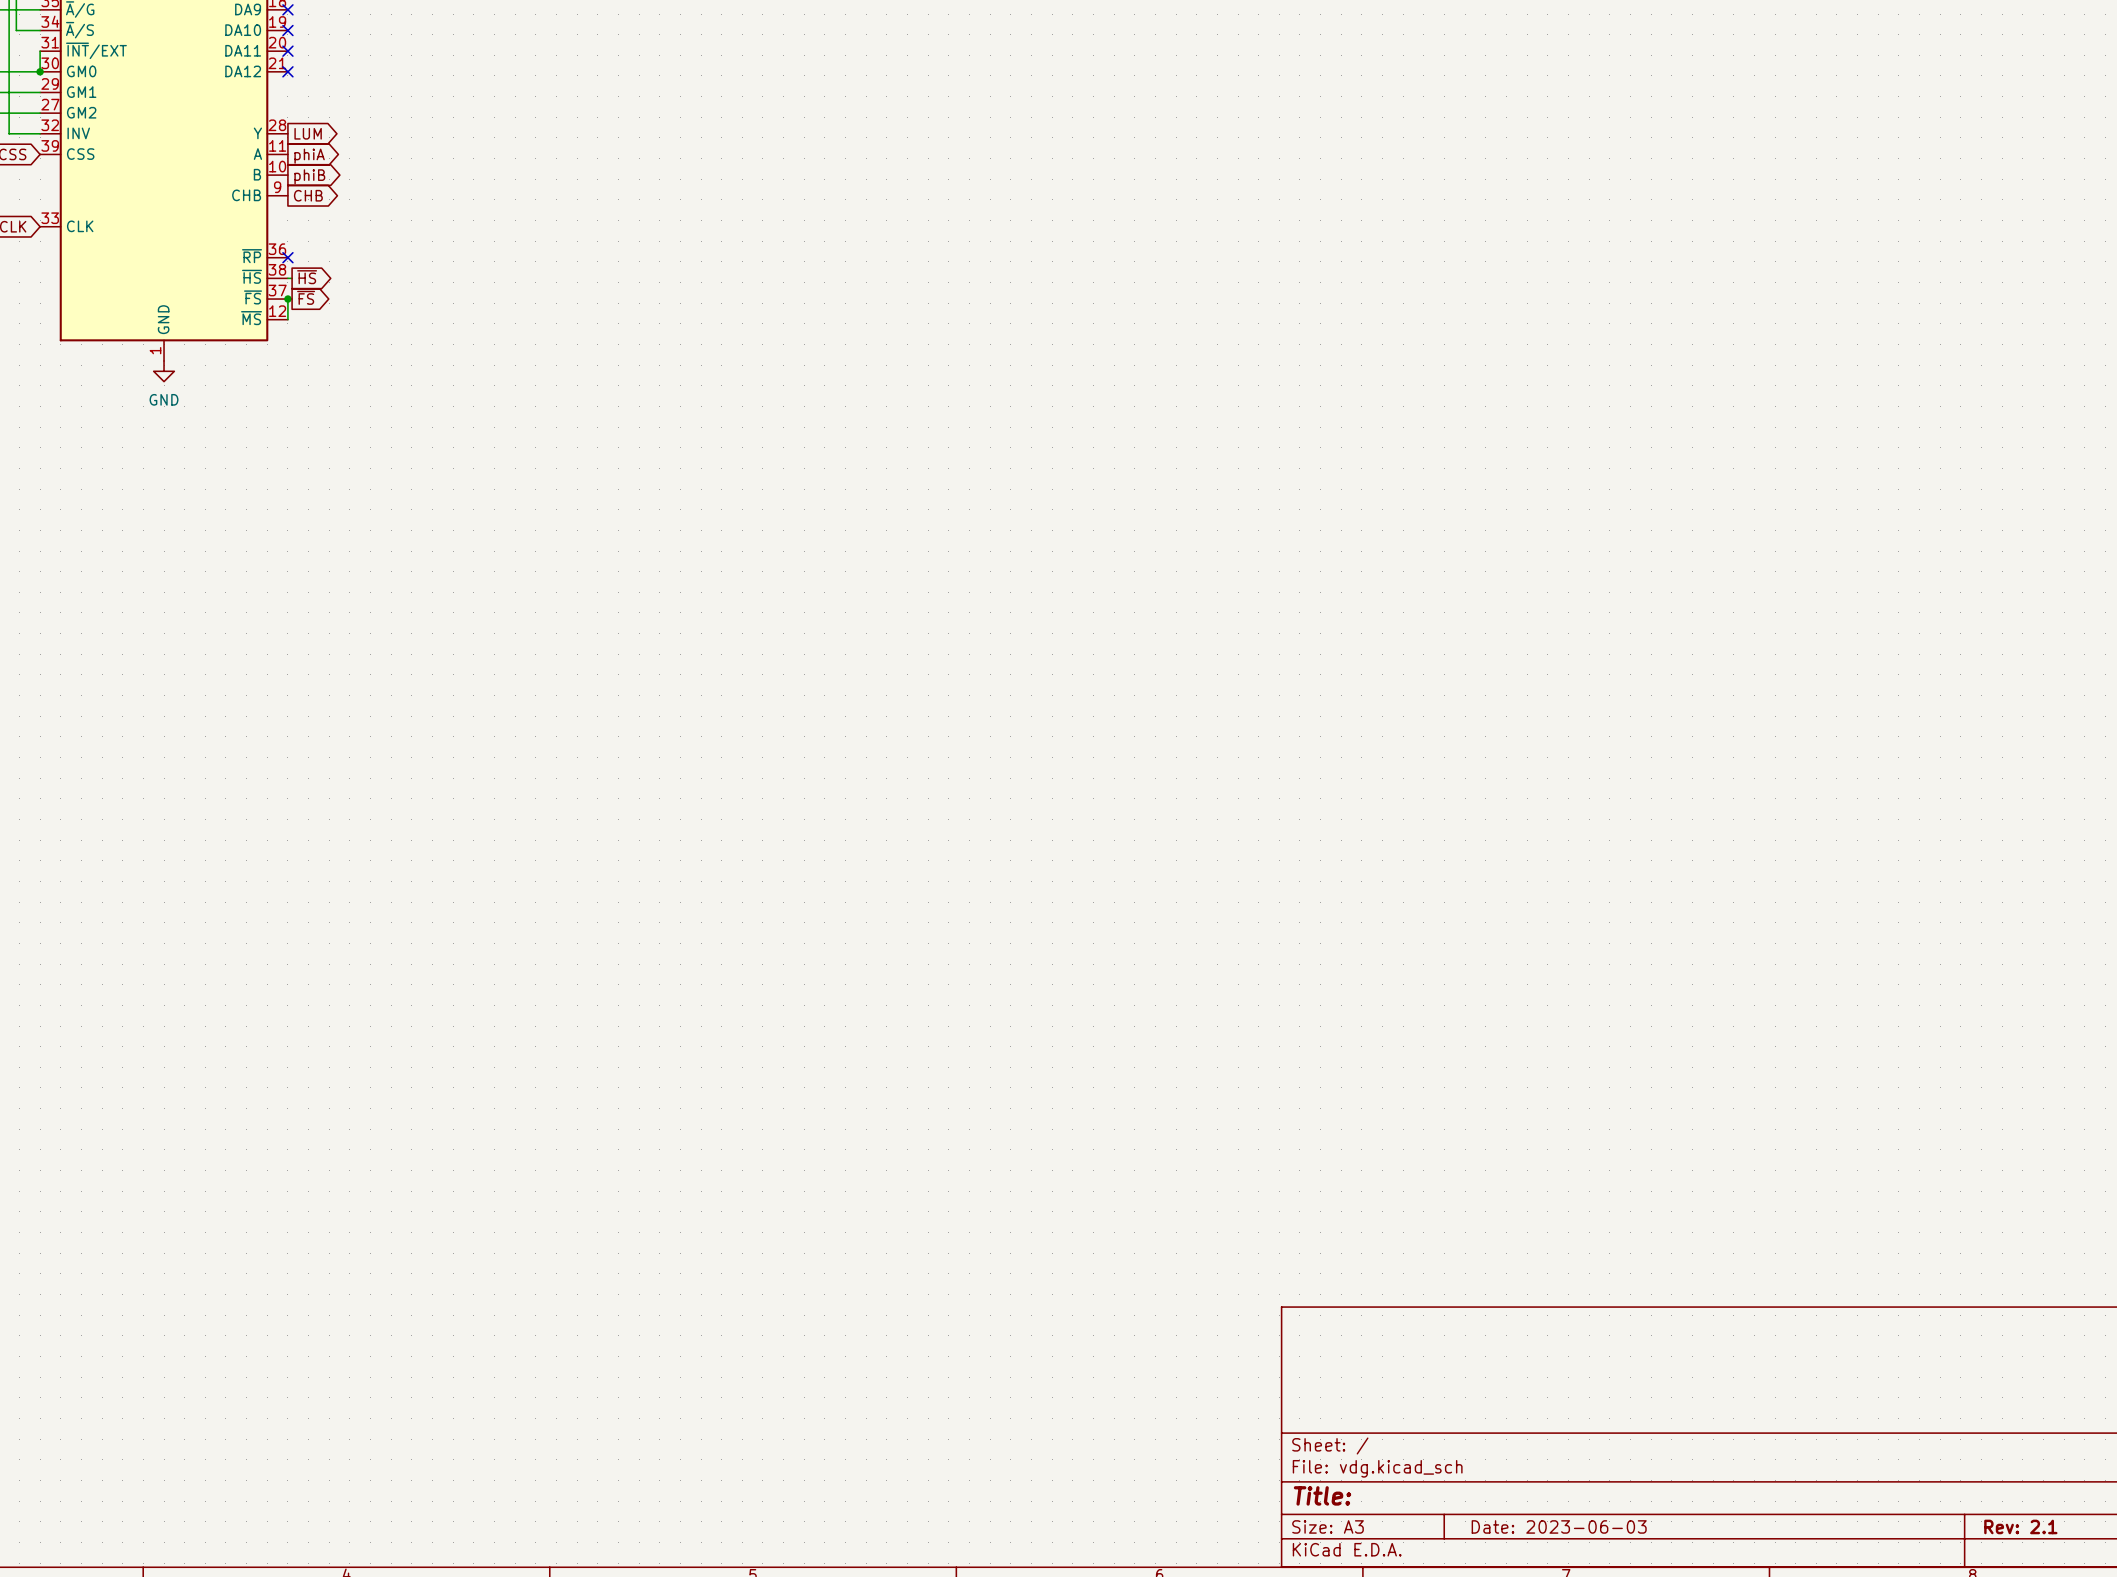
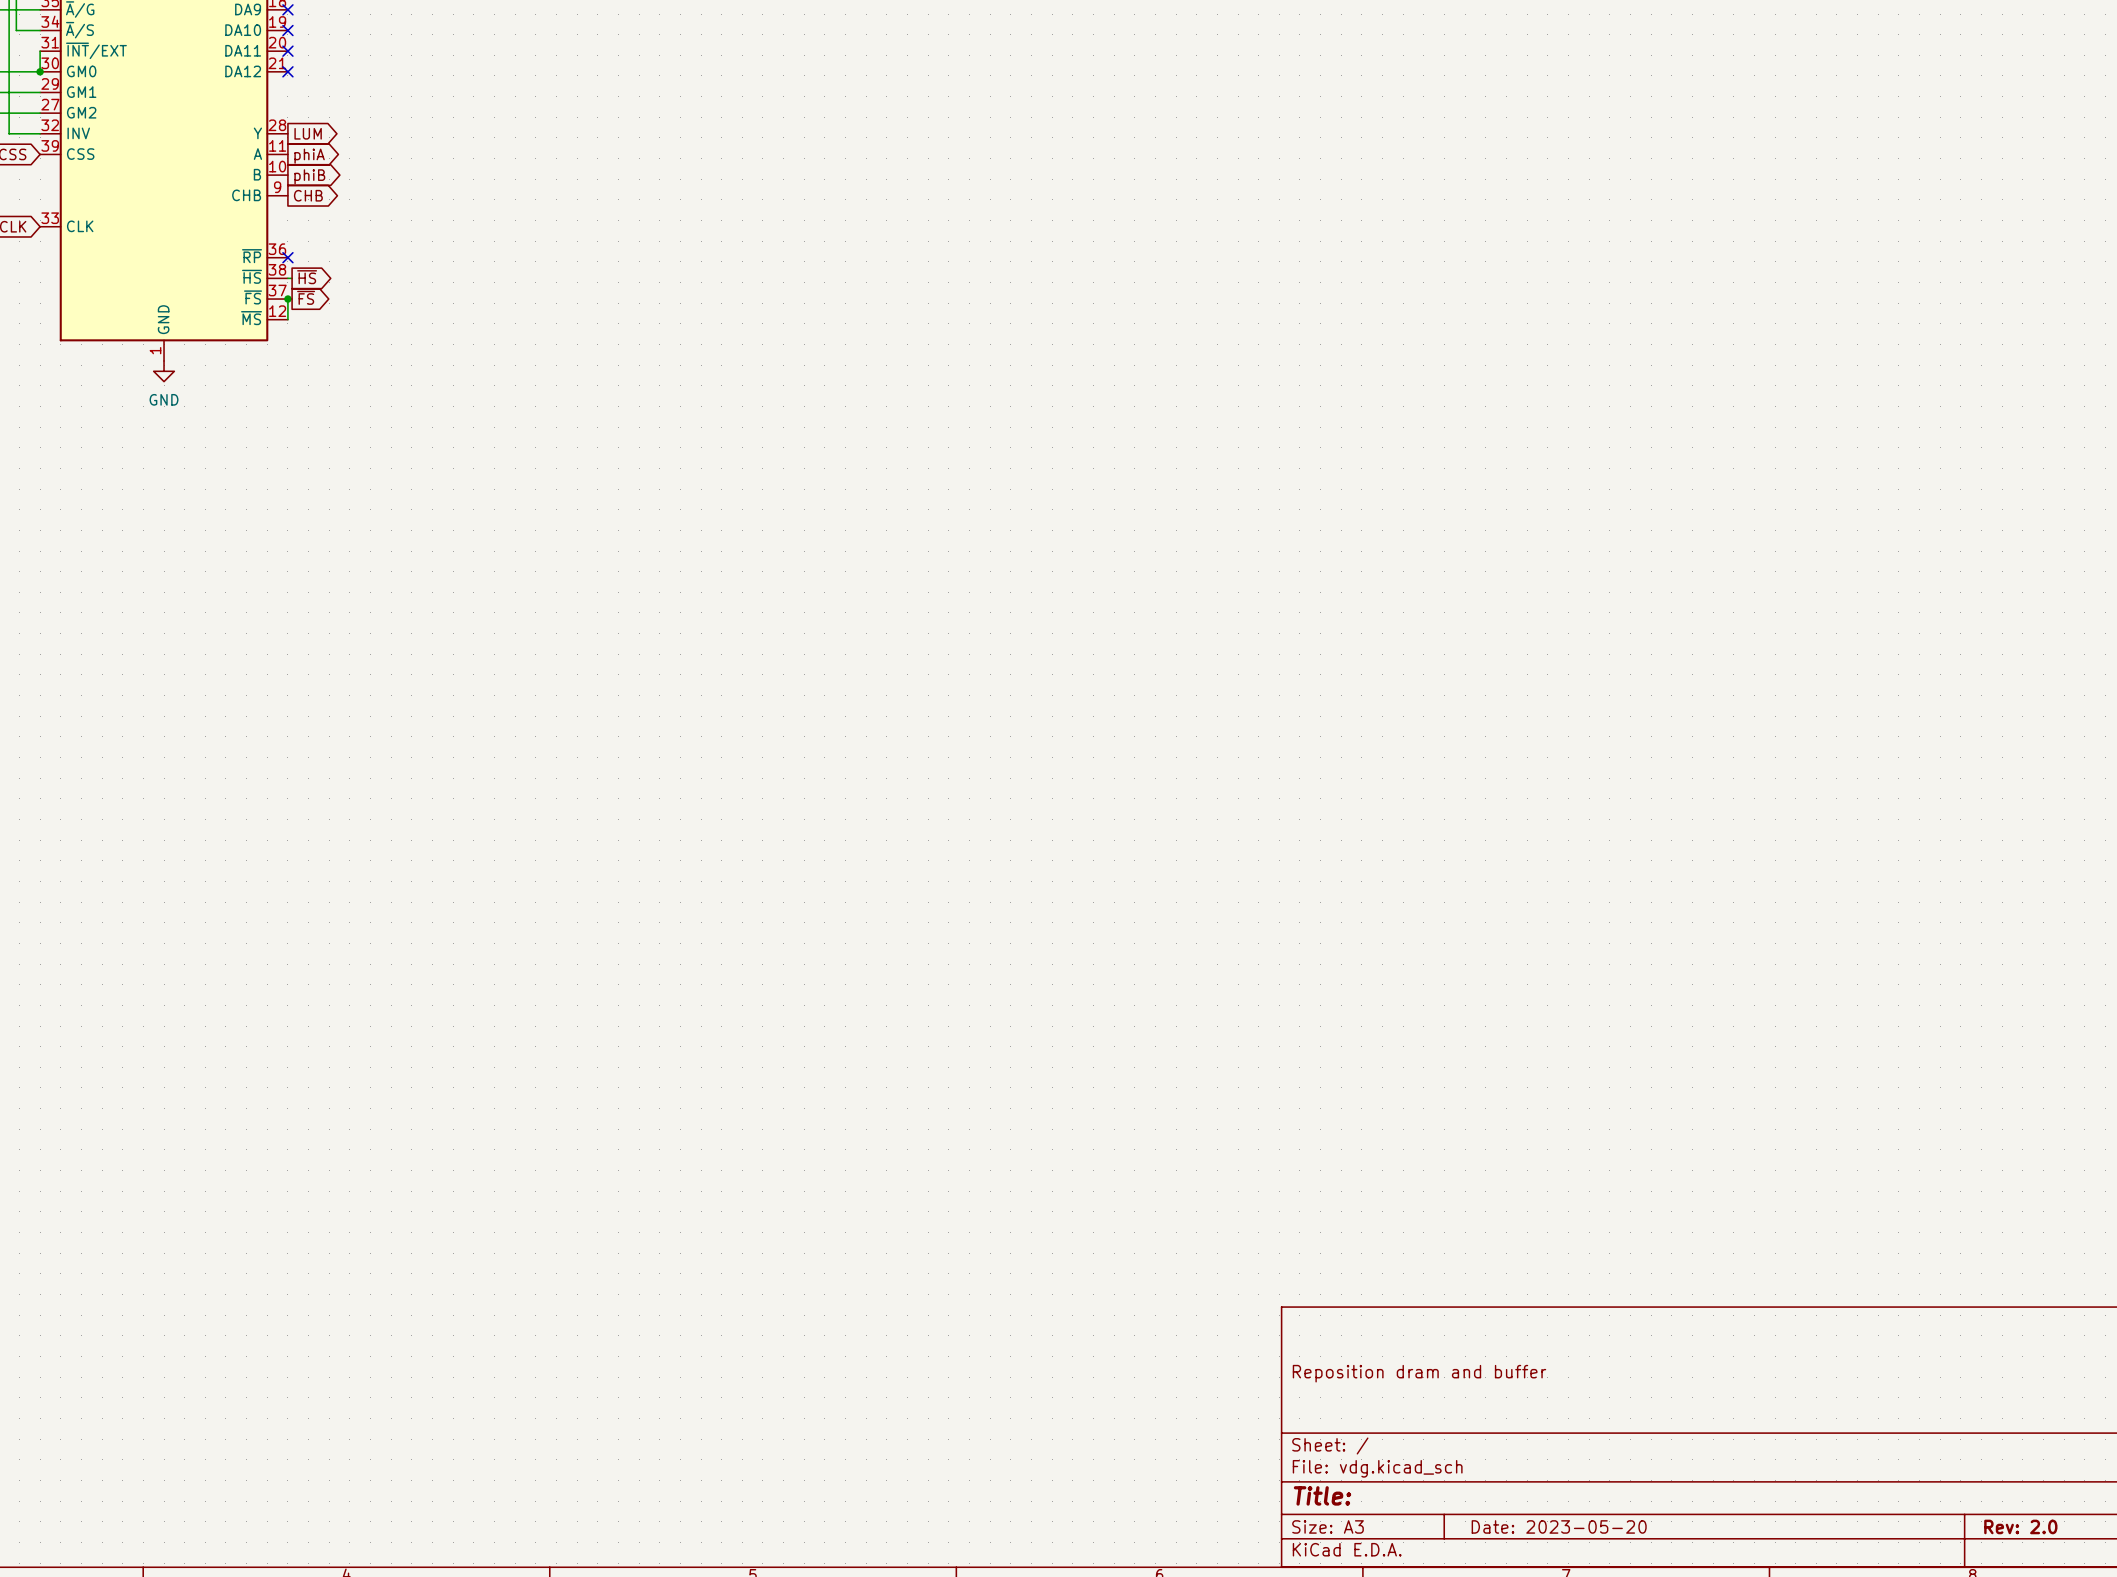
title block: none -> Reposition dram and buffer (1419, 1373)
title block: Date: 2023-06-03 (1559, 1526) -> Date: 2023-05-20 (1559, 1526)
title block: Rev: 2.1 (2020, 1526) -> Rev: 2.0 (2020, 1526)

